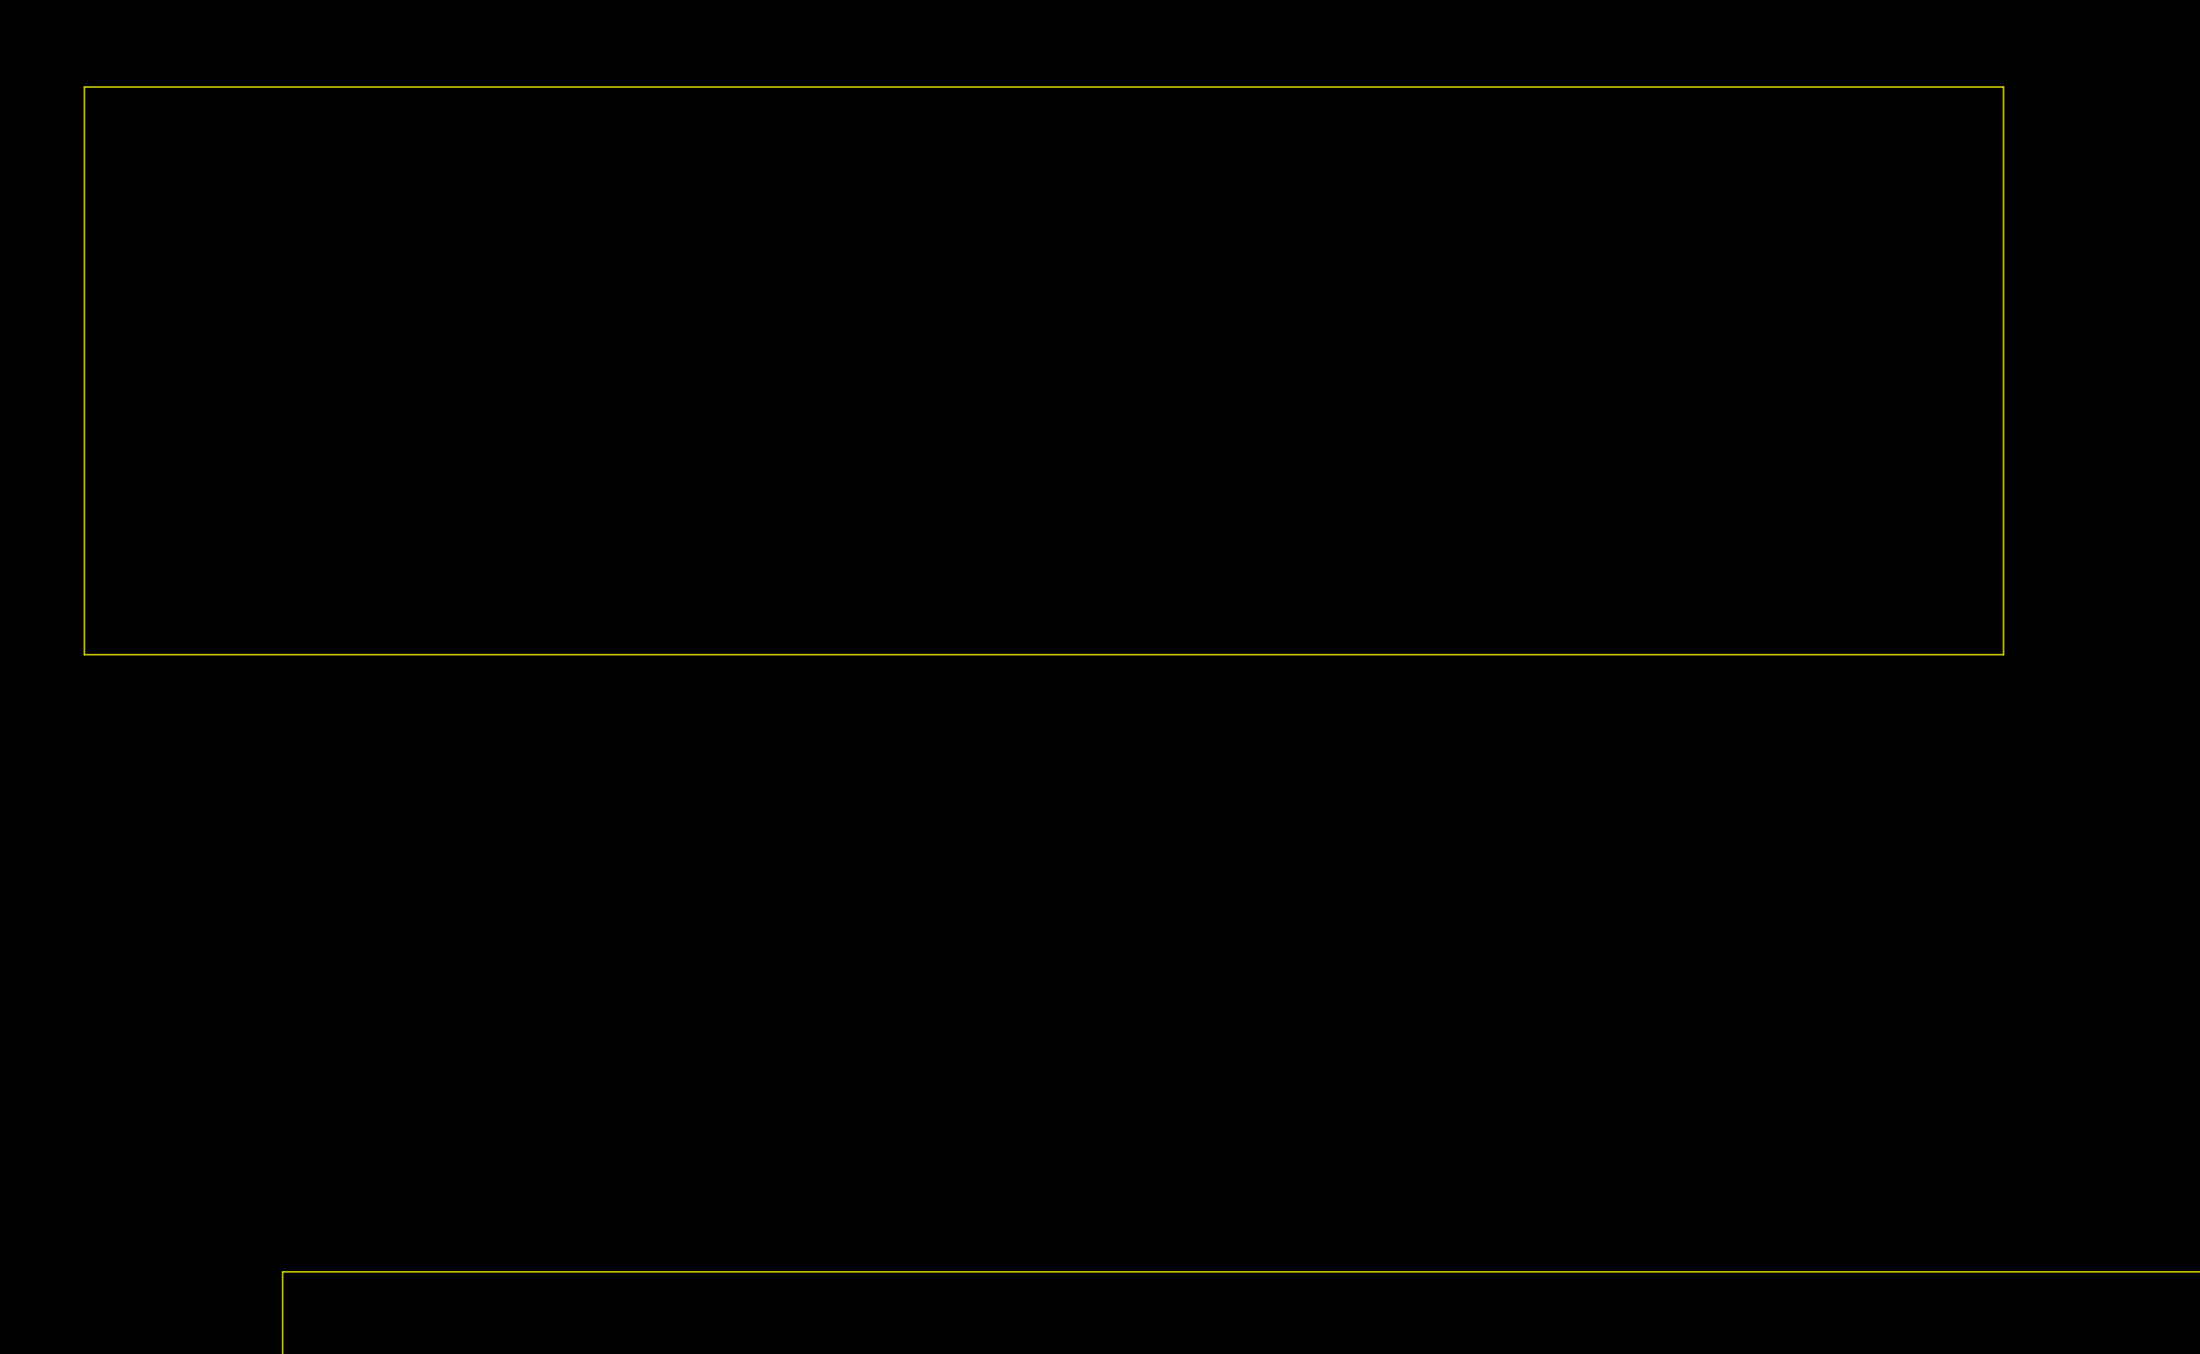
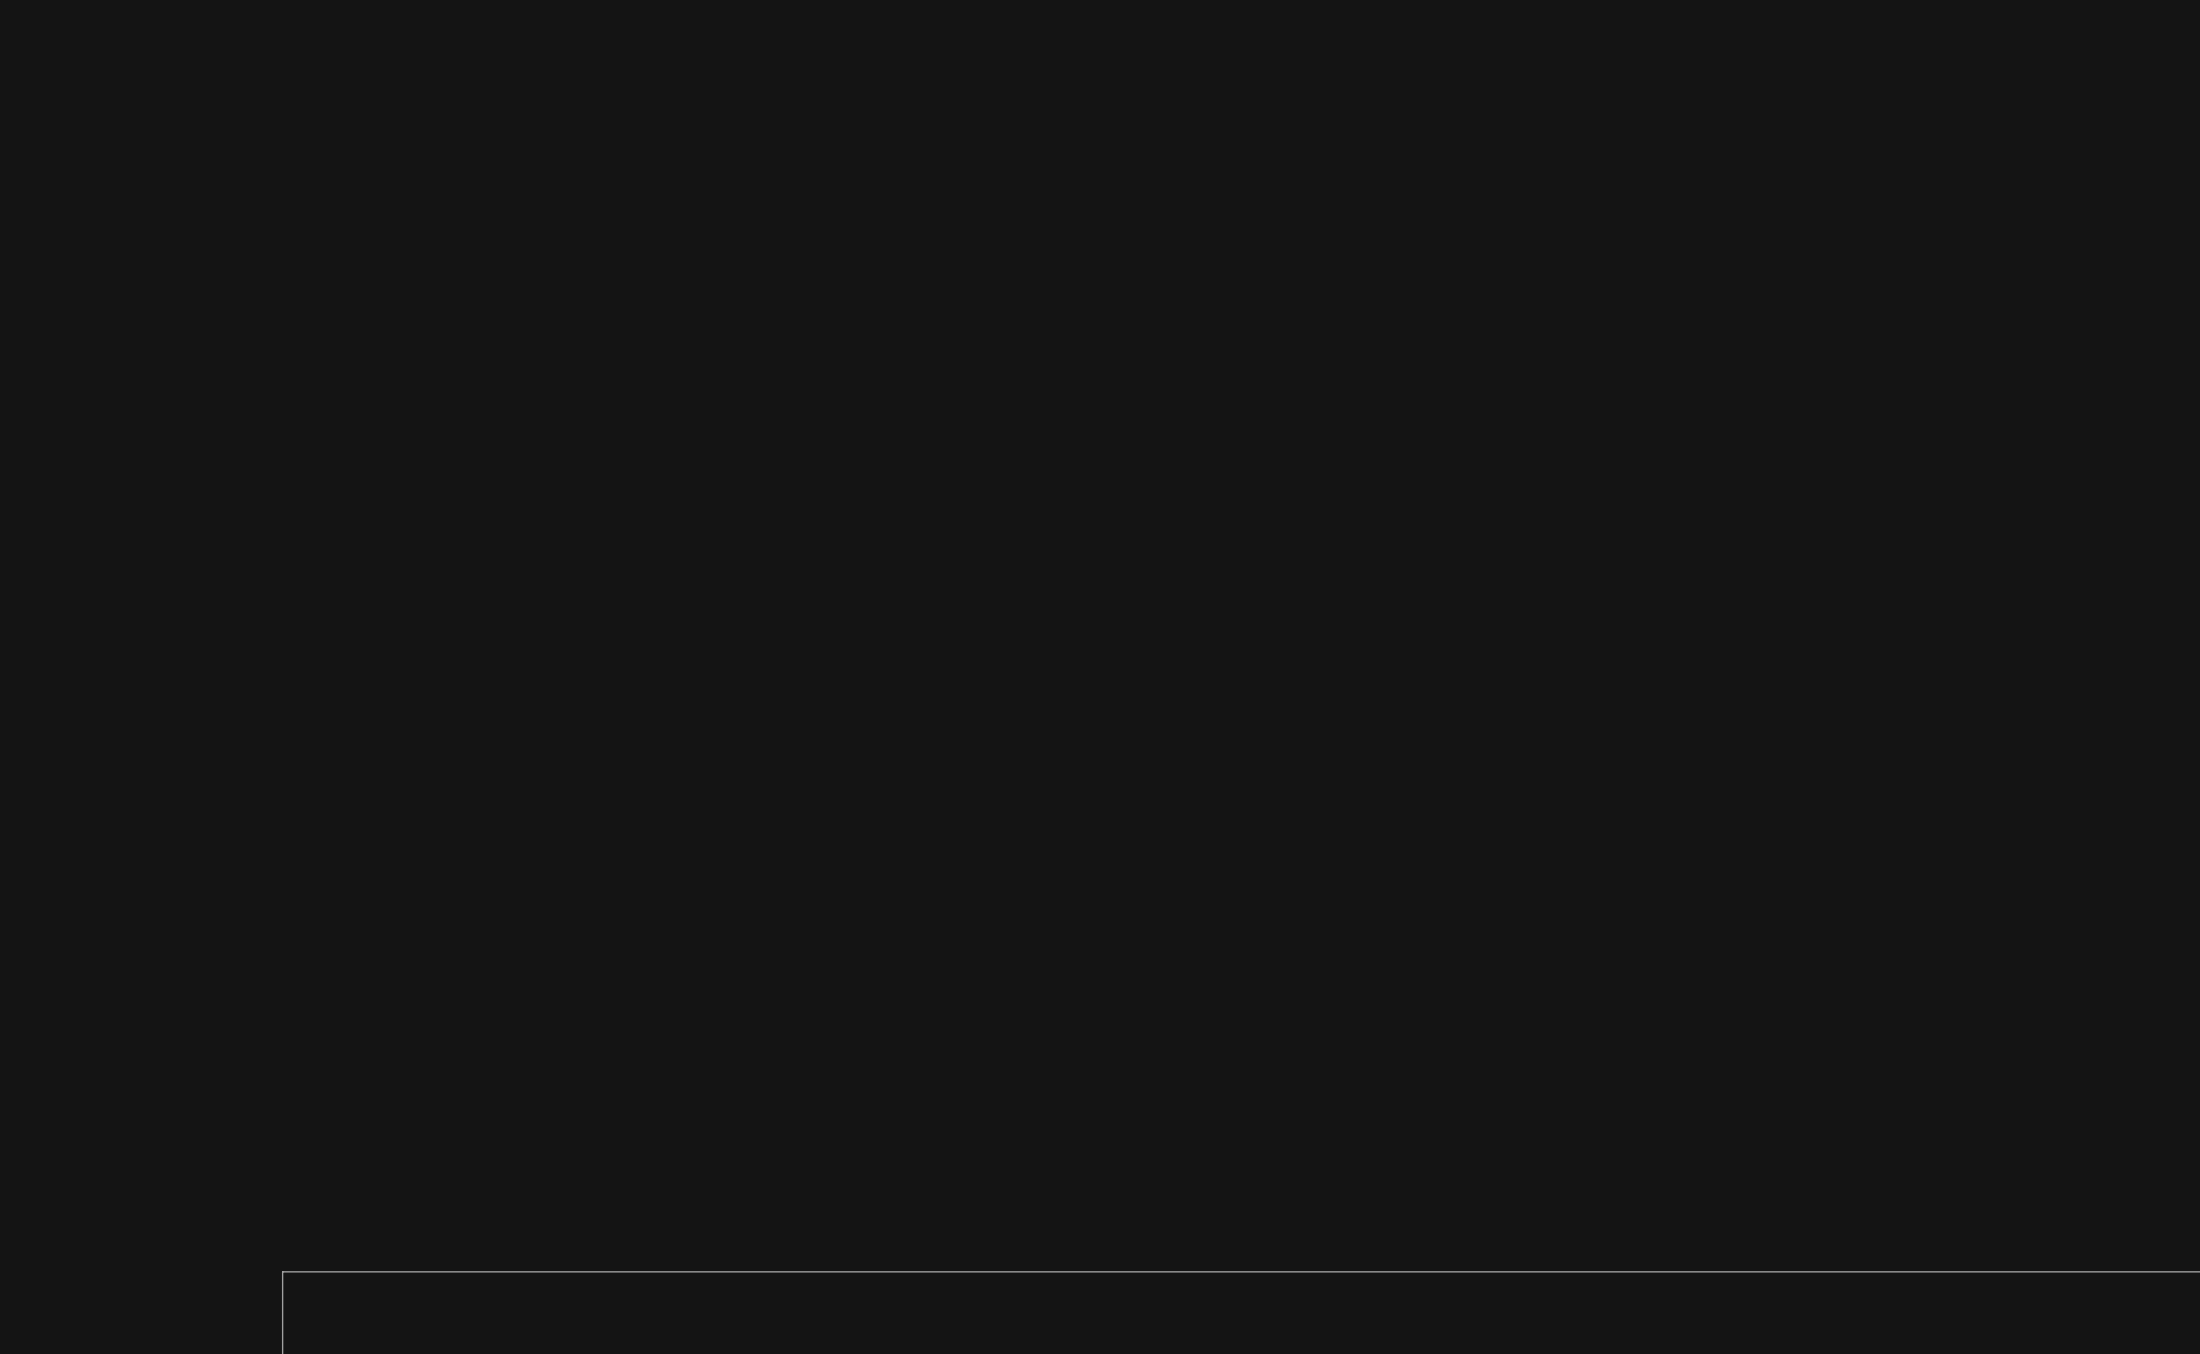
board edge: (2003, 87) (84, 87) (84, 654) (2003, 654) (2003, 87) -> none

